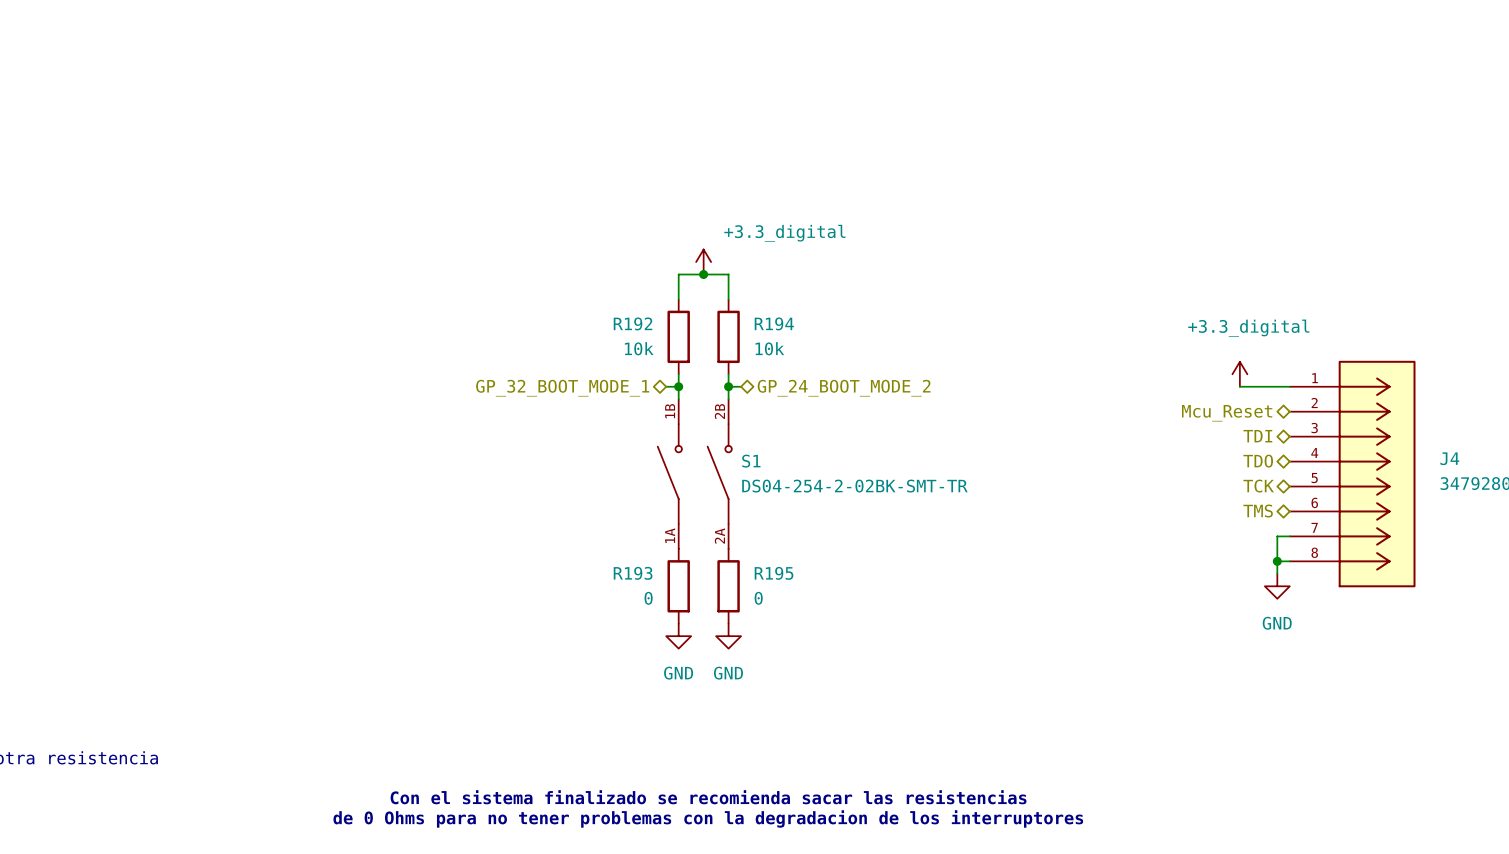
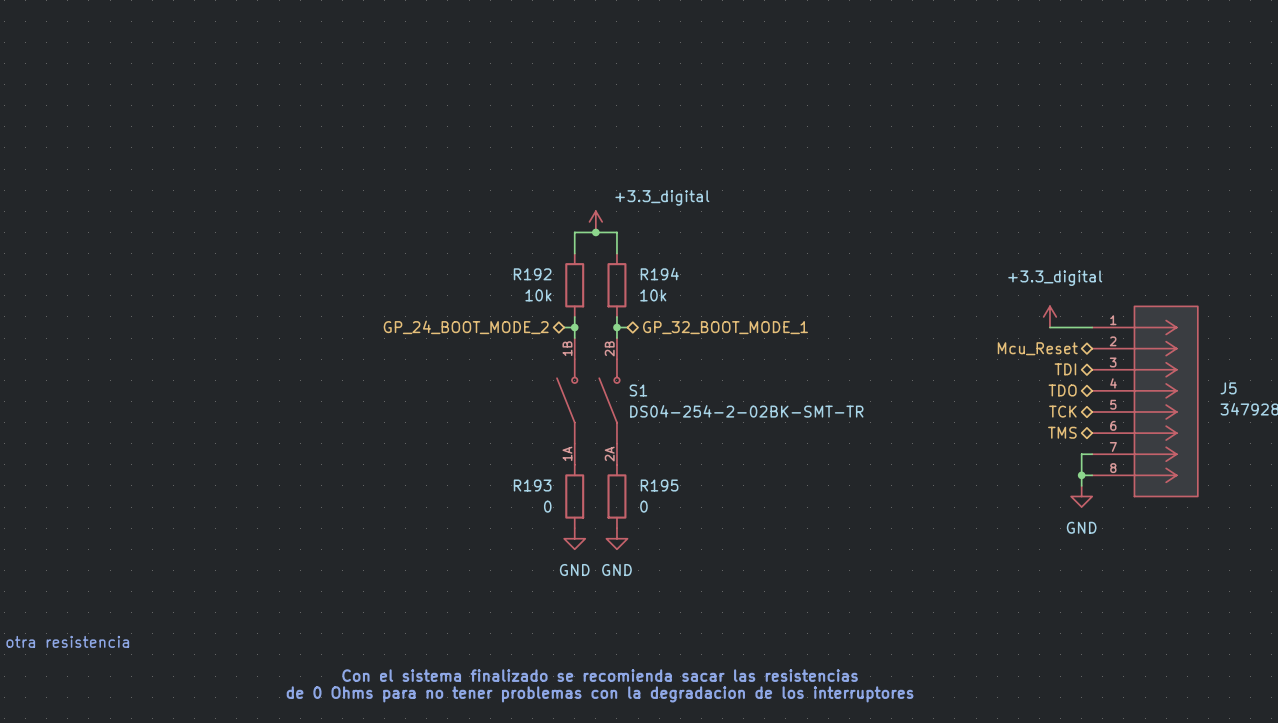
hierarchical label: GP_32_BOOT_MODE_1 (562, 388) -> GP_24_BOOT_MODE_2 (466, 327)
hierarchical label: GP_24_BOOT_MODE_2 (844, 388) -> GP_32_BOOT_MODE_1 (725, 327)
J4 name: J4 (1449, 458) -> J5 (1228, 388)

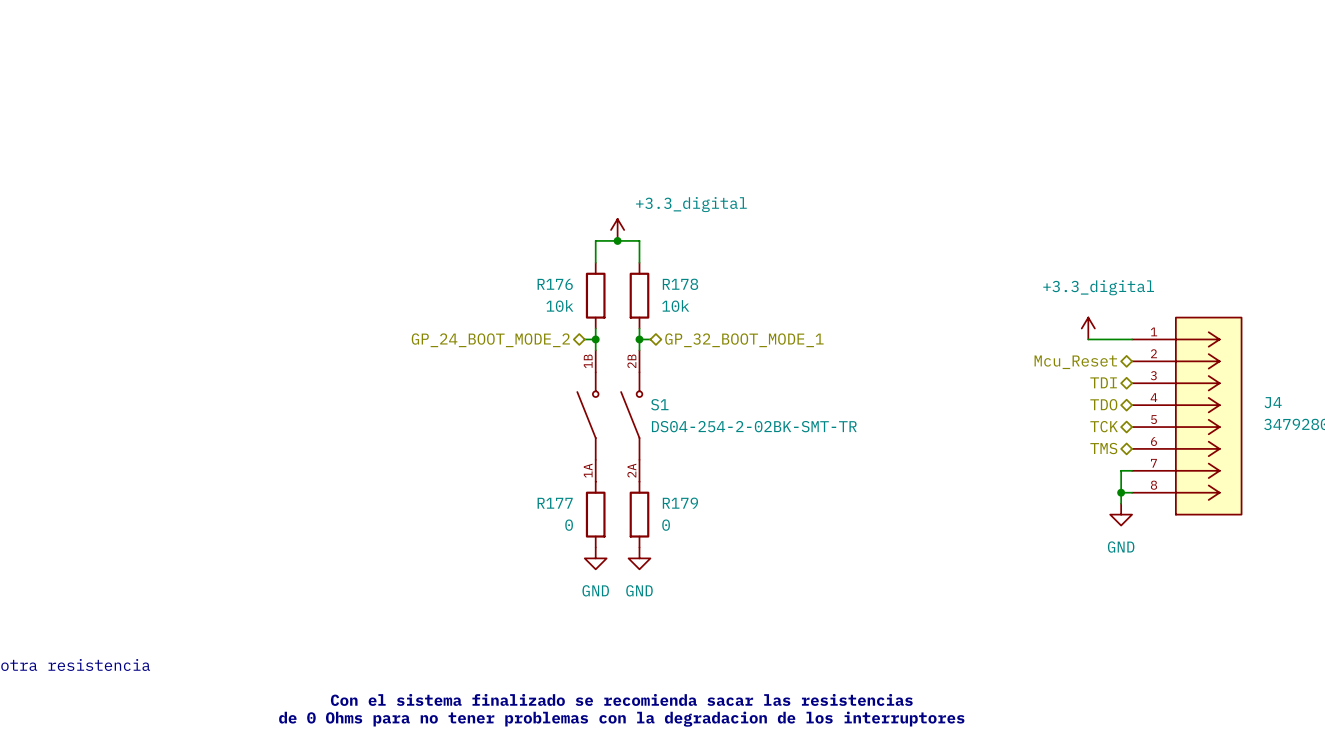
R192 name: R192 (532, 274) -> R176 (555, 284)
R194 name: R194 (659, 274) -> R178 (680, 284)
J5 name: J5 (1228, 388) -> J4 (1273, 402)
R193 name: R193 (532, 485) -> R177 (555, 503)
R195 name: R195 (659, 485) -> R179 (680, 503)

